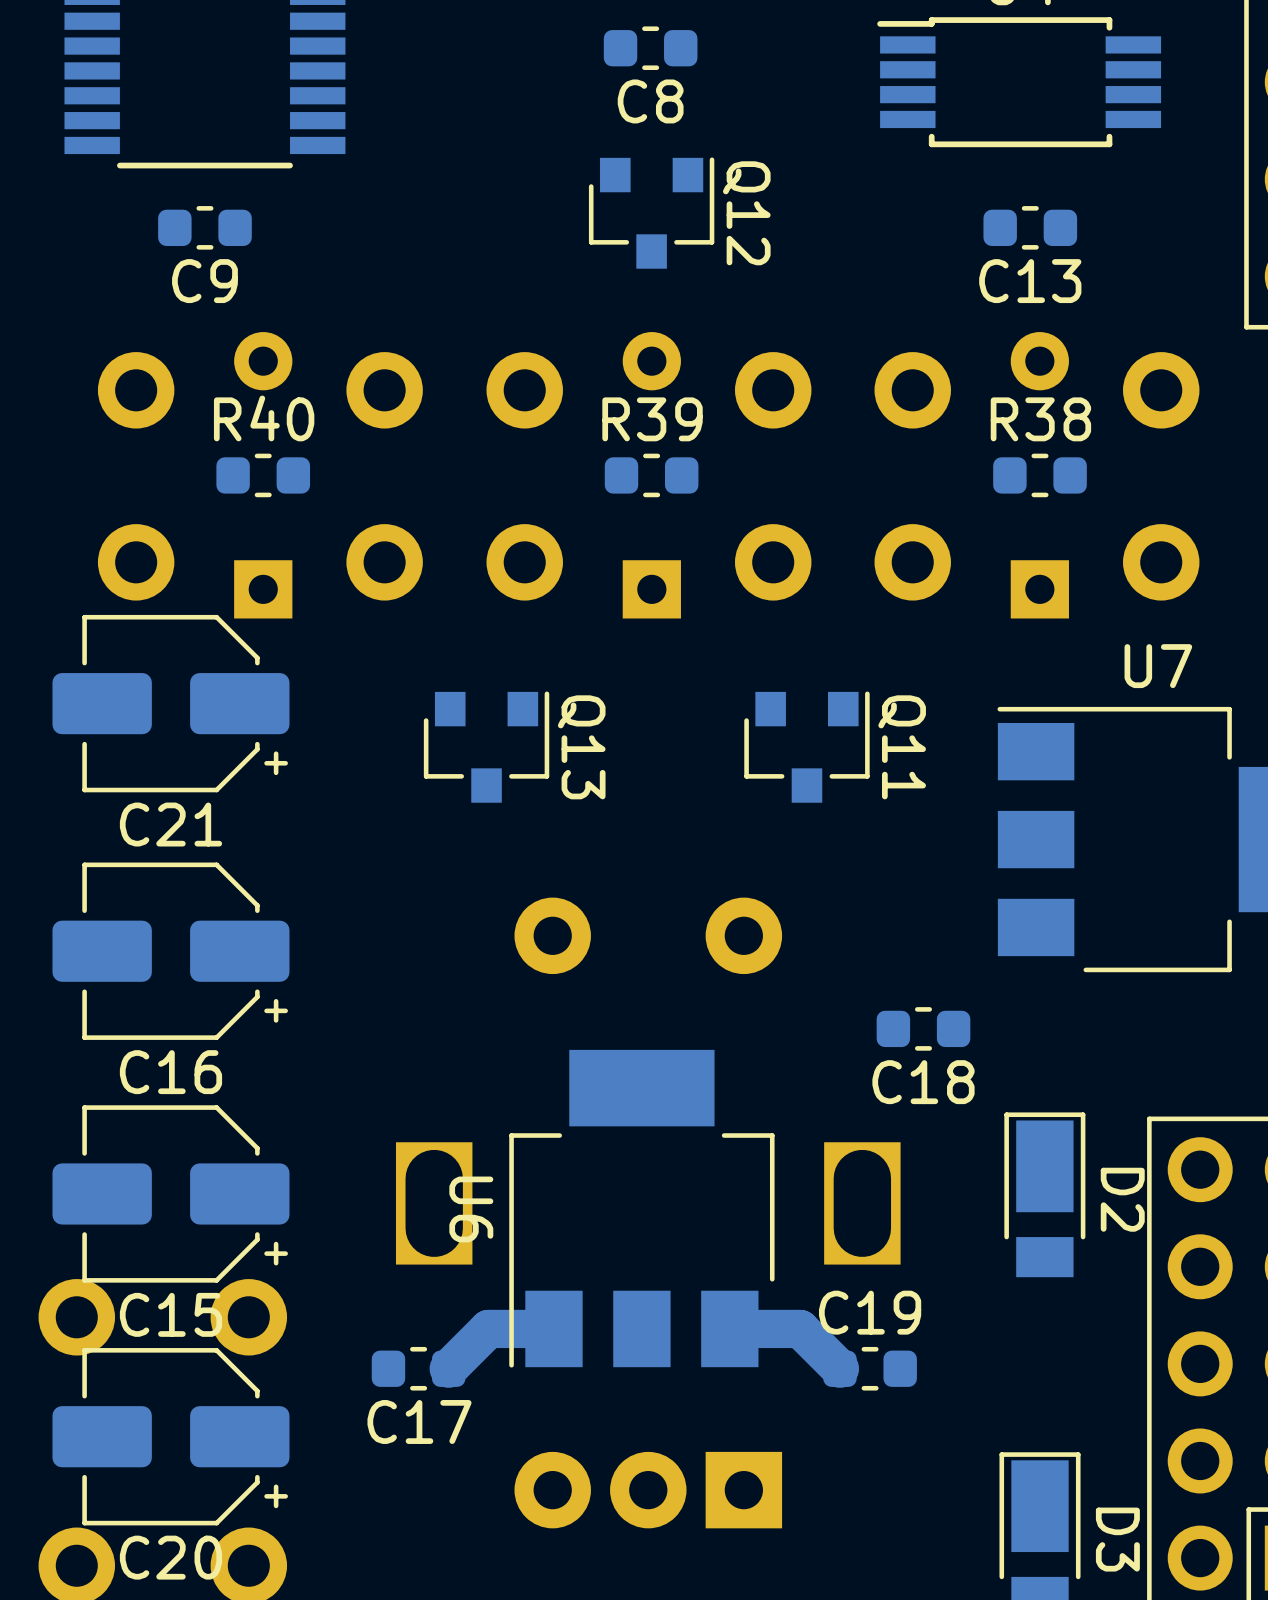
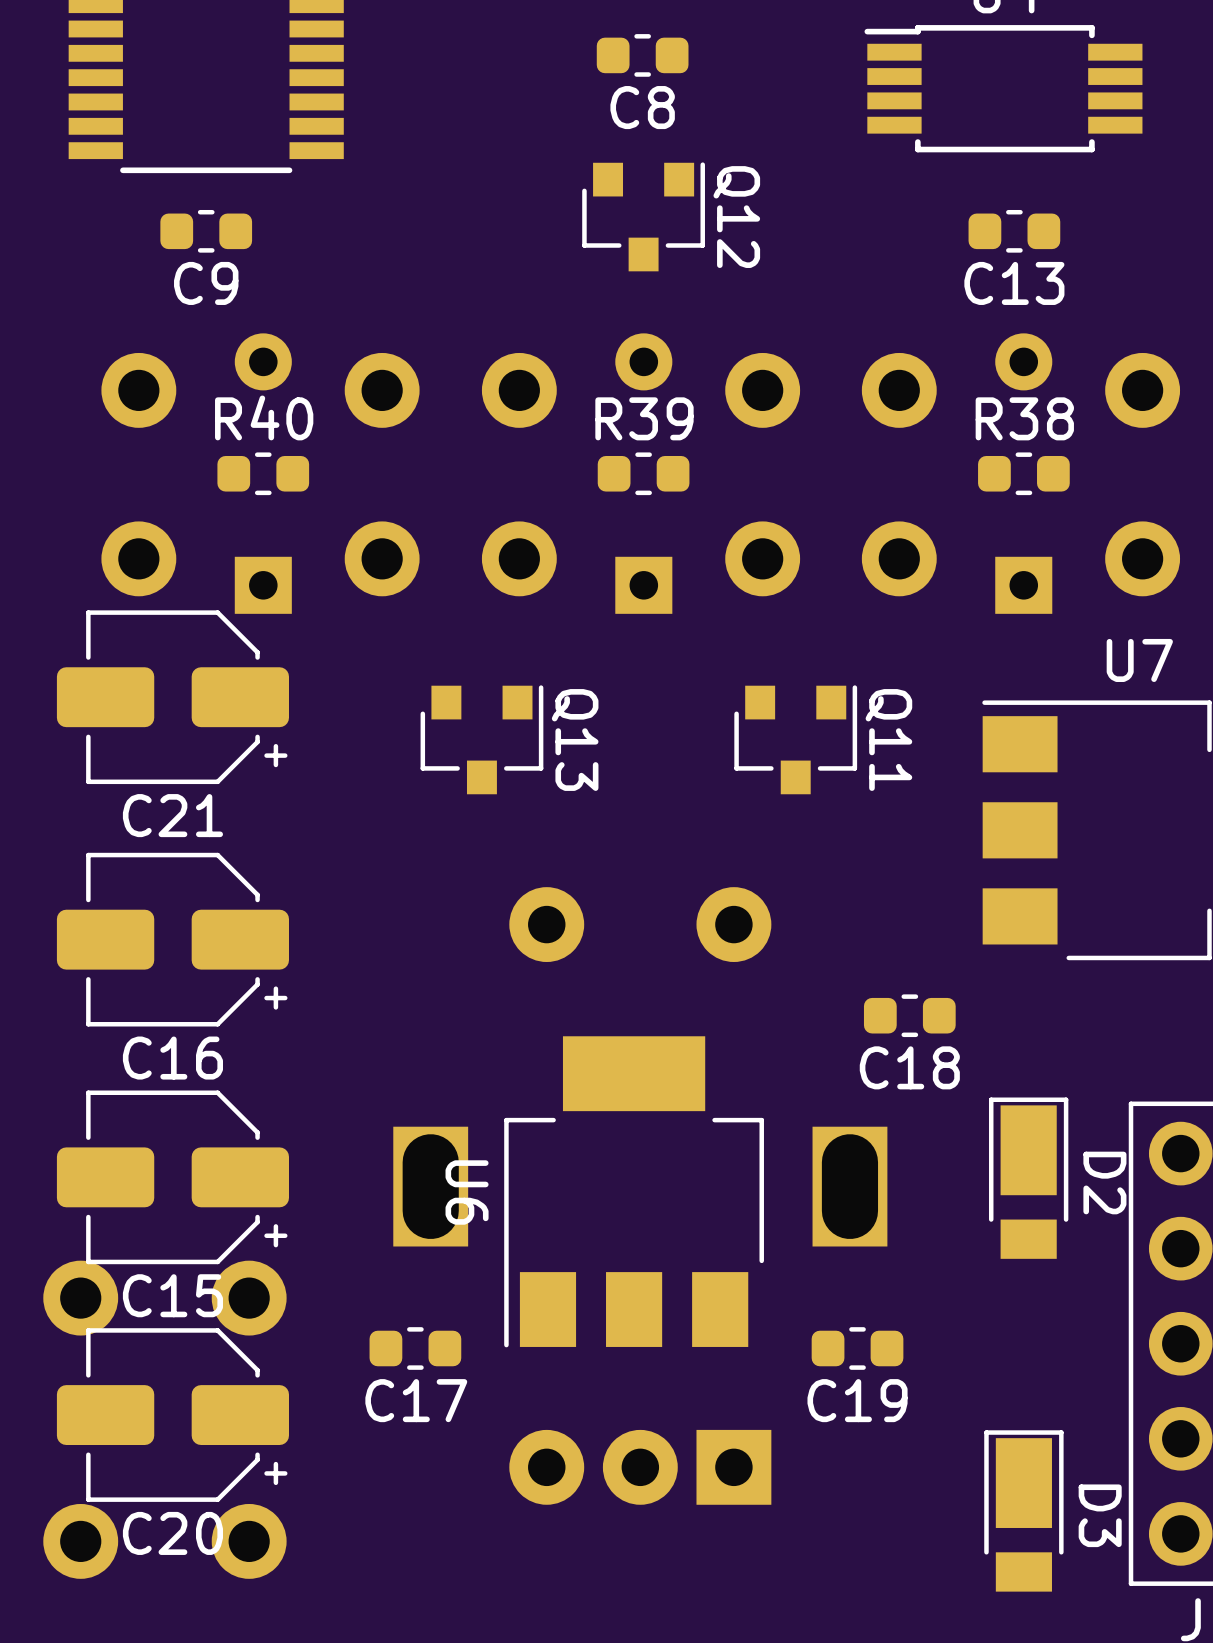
C19 name position: C19 (870, 1312) -> C19 (857, 1400)
track: (553, 1328) (488, 1328) (448, 1368) -> none
track: (729, 1328) (800, 1328) (839, 1368) -> none

